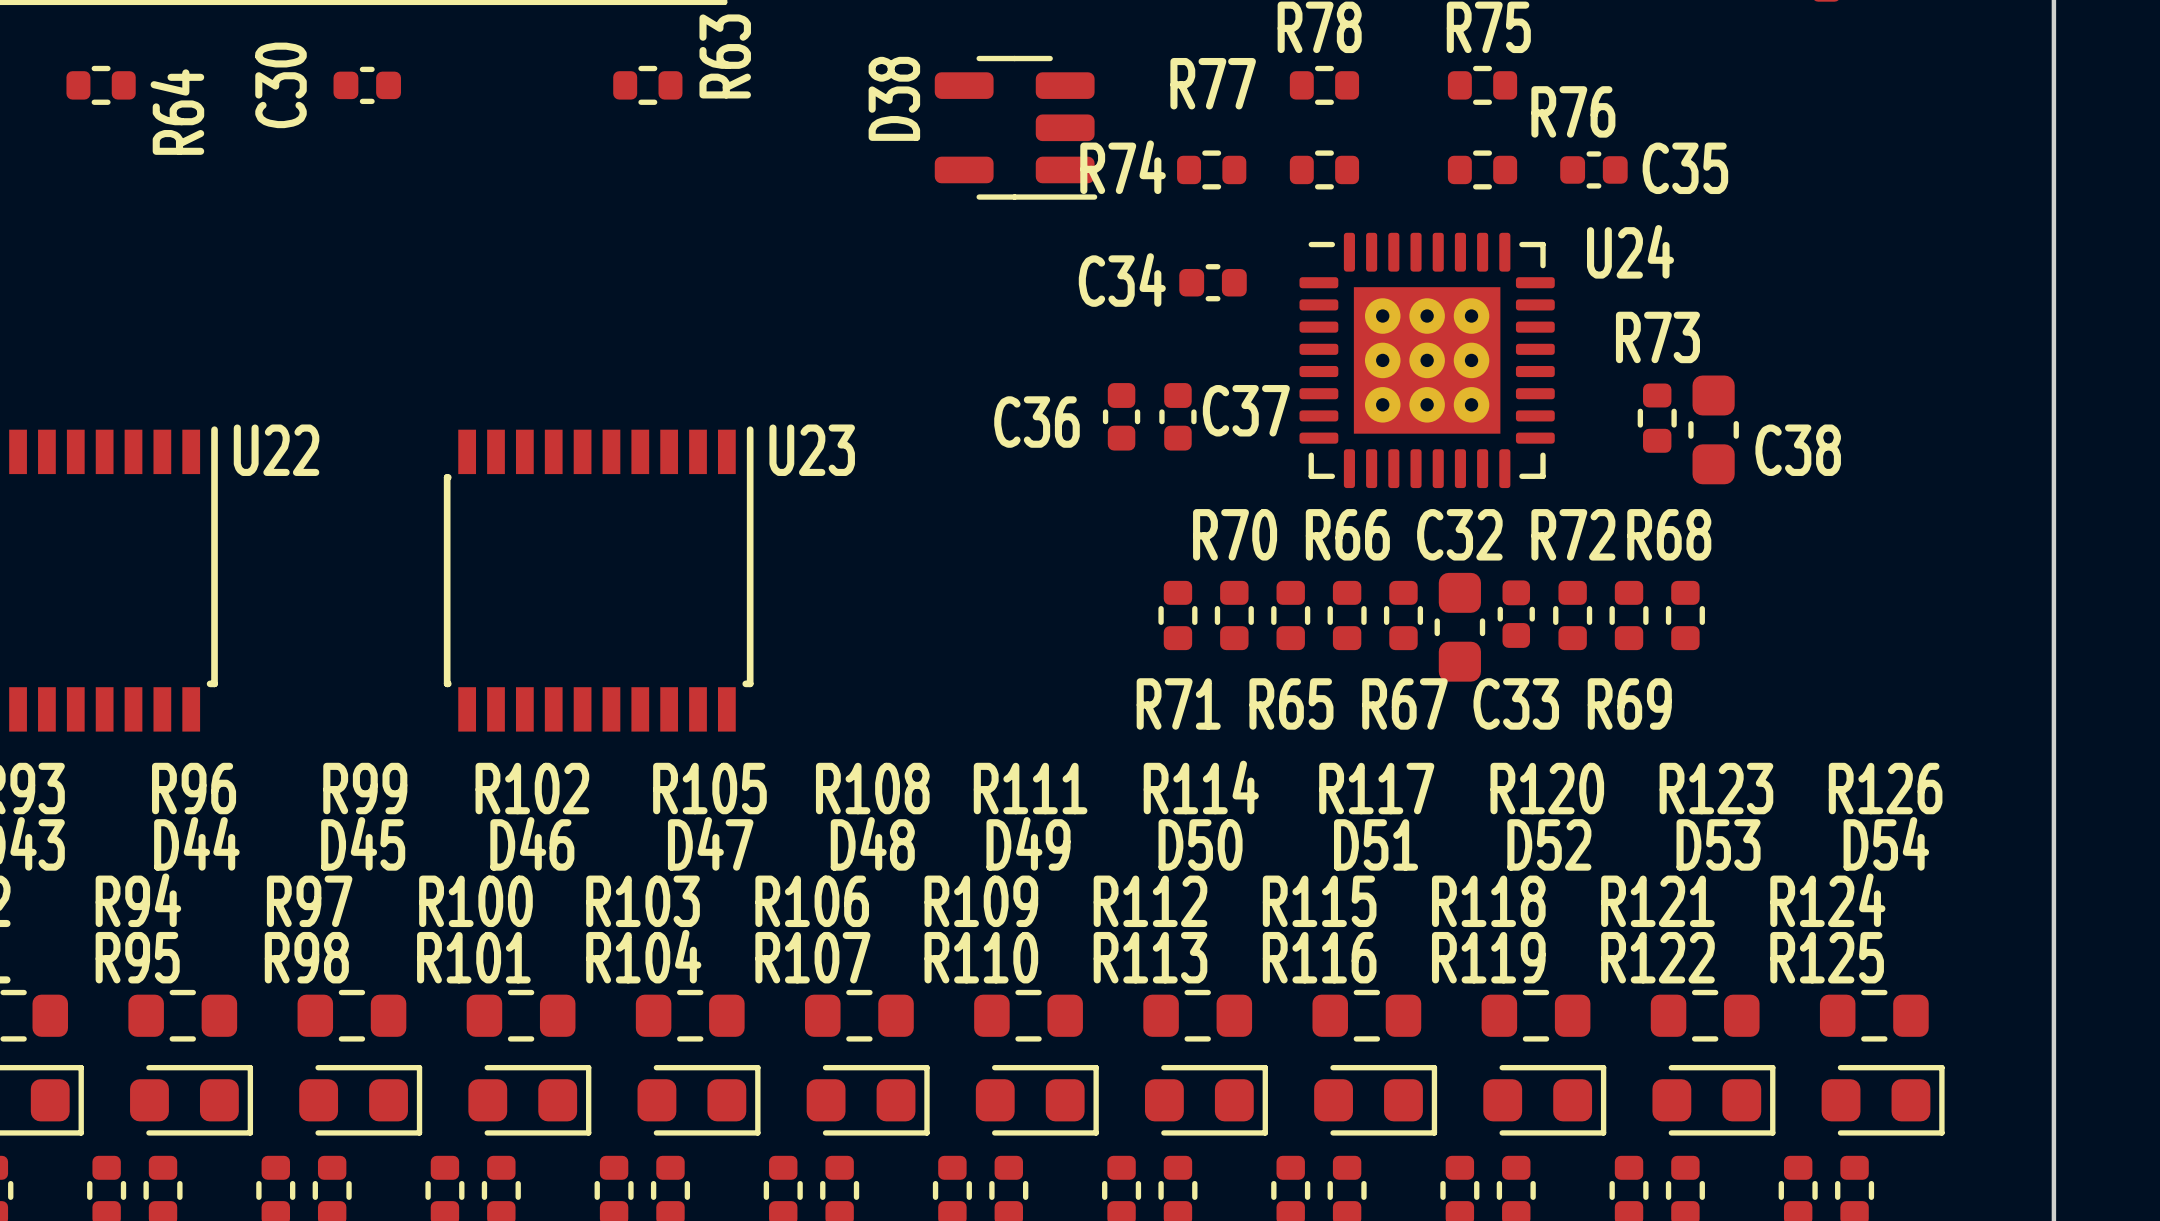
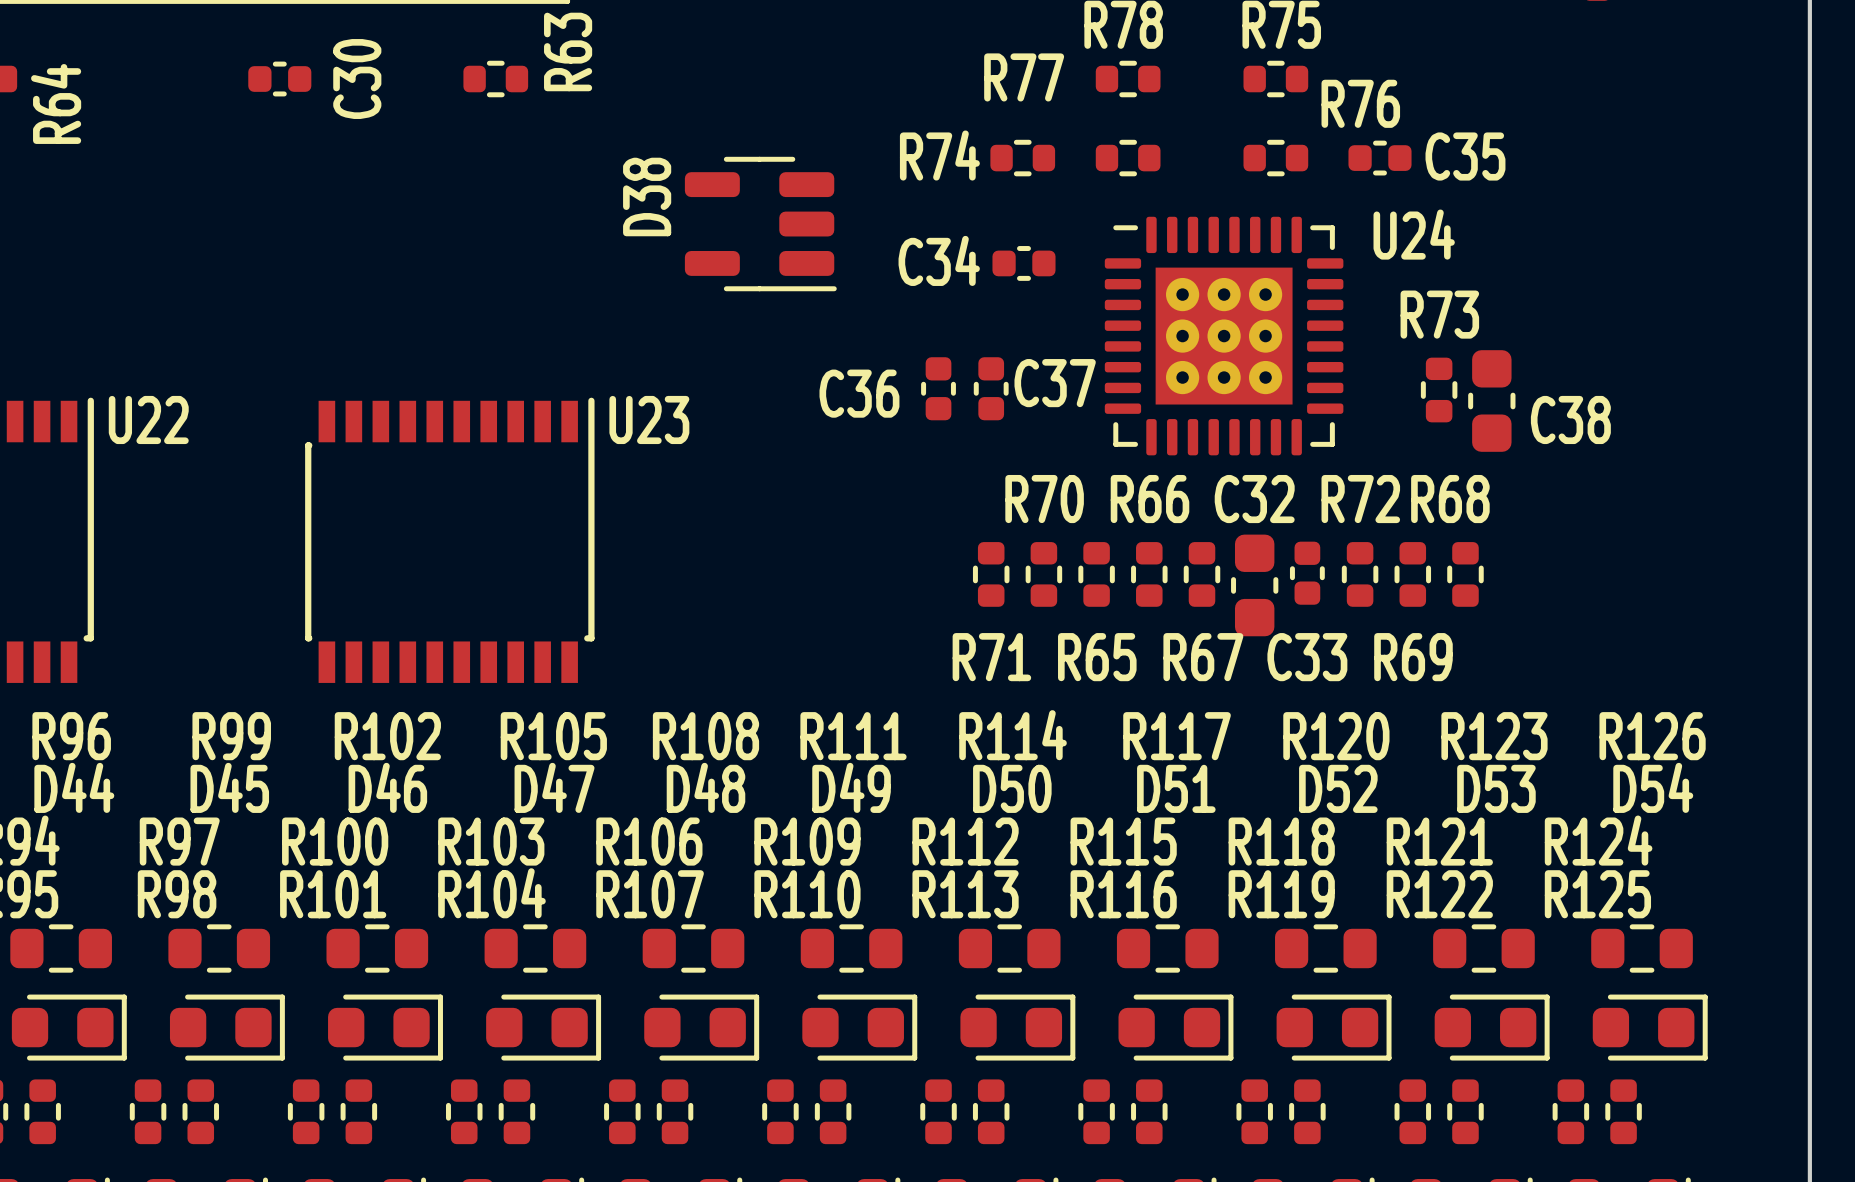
C30 name position: C30 (281, 85) -> C30 (357, 79)
C30 position: (367, 85) -> (279, 79)
D38 position: (1016, 127) -> (760, 224)

